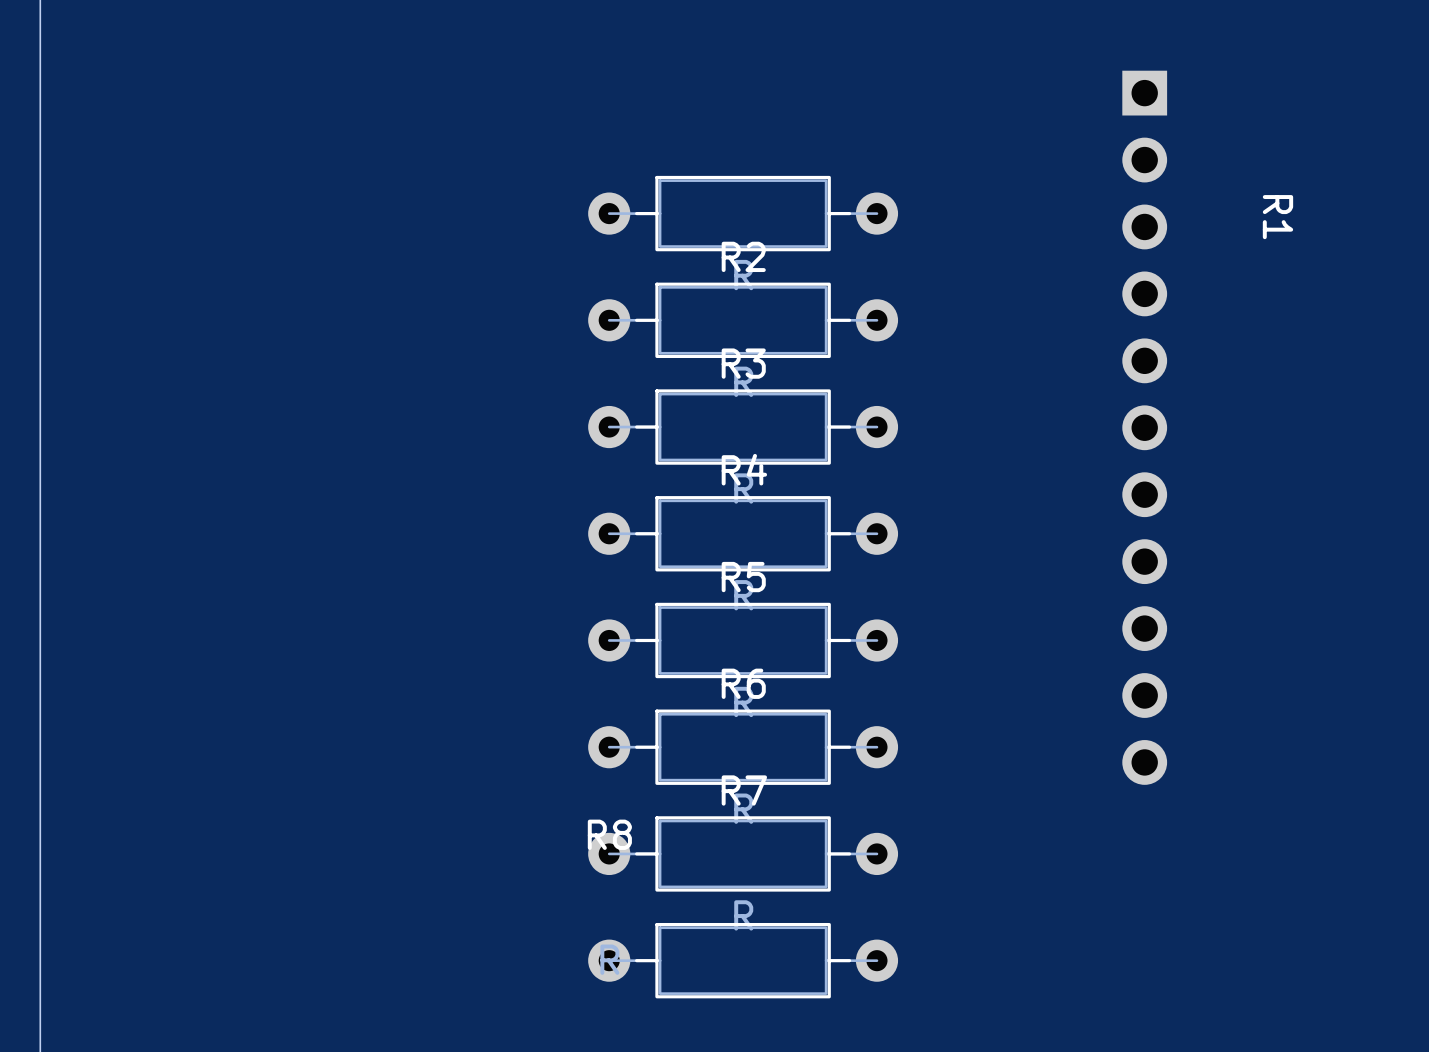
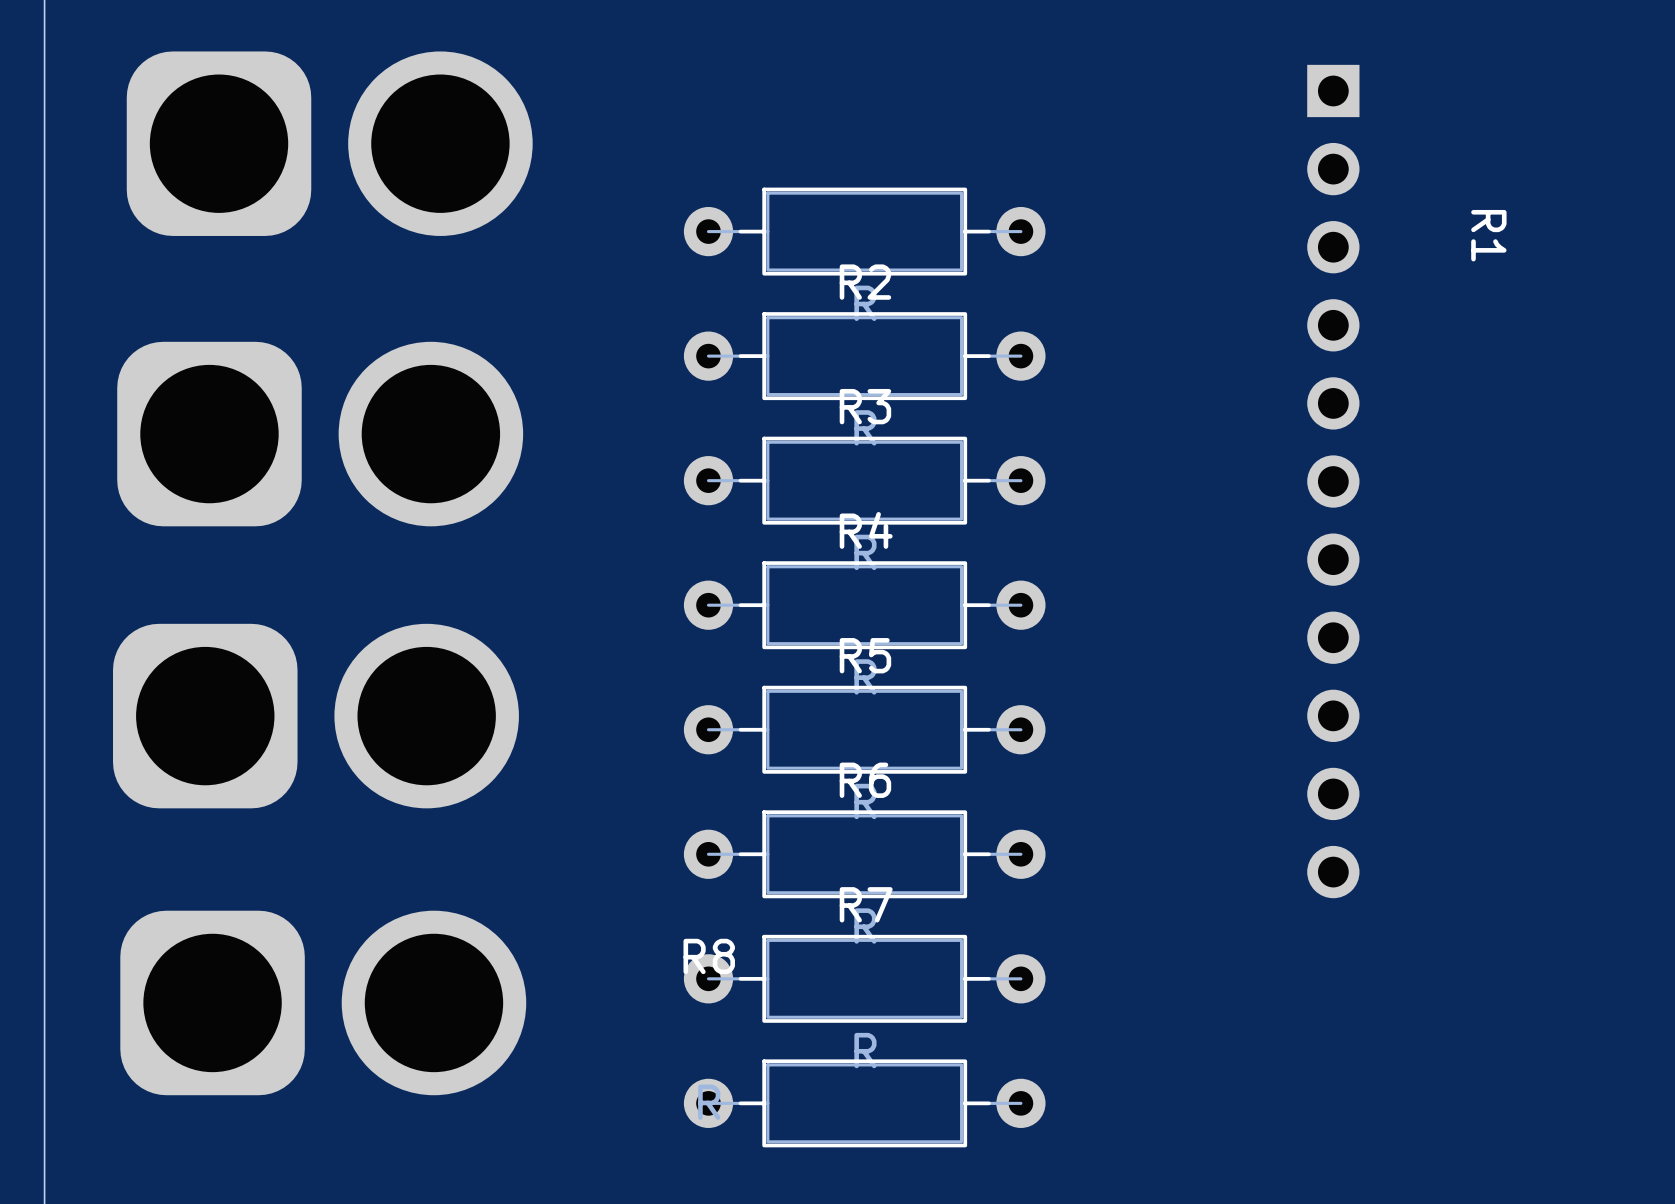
part: none -> (329, 143)
part: none -> (320, 434)
part: none -> (315, 716)
part: none -> (323, 1002)

